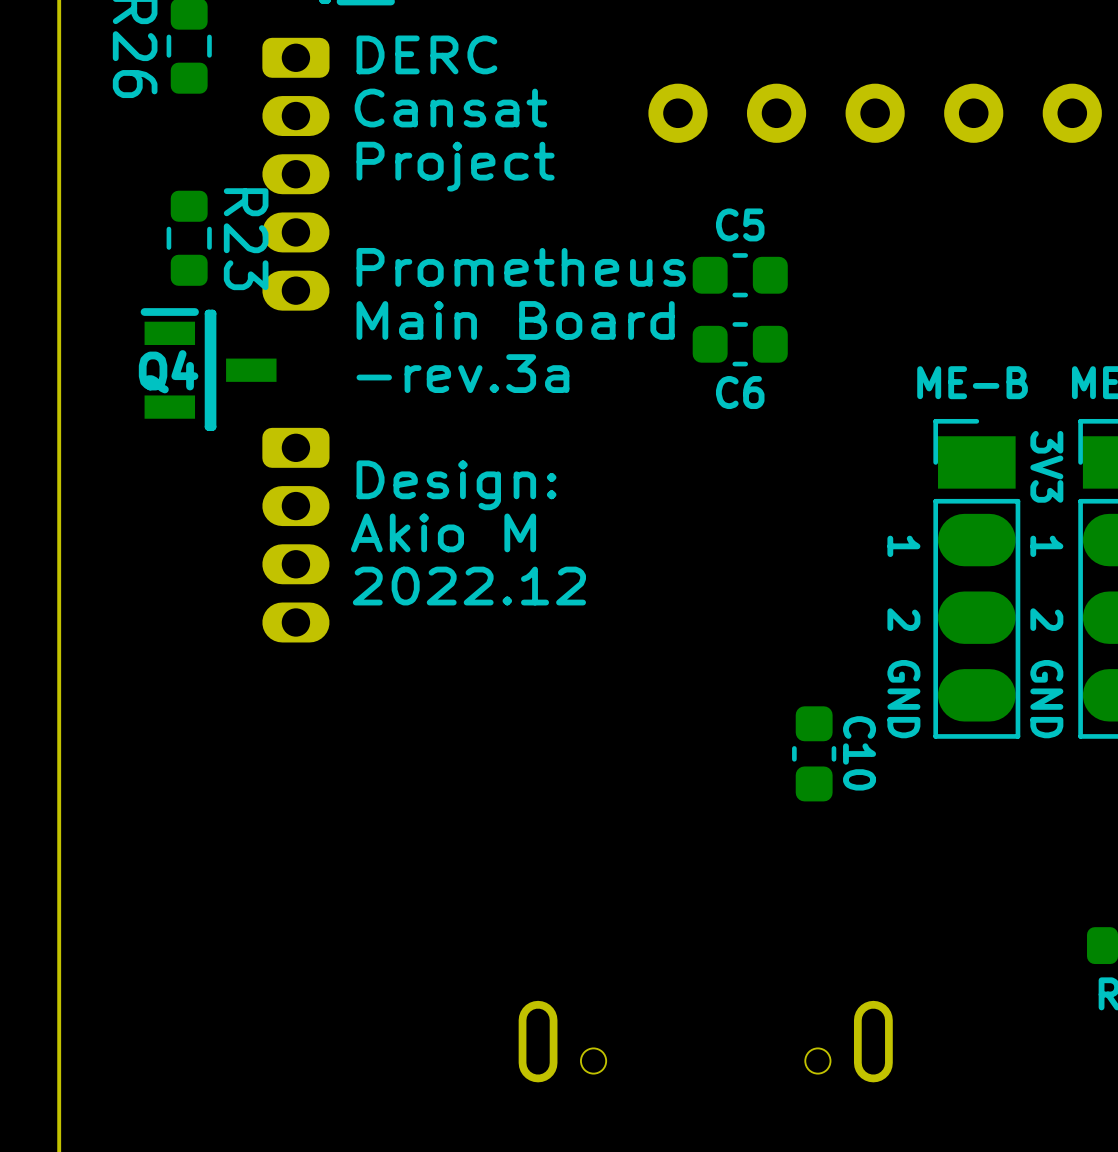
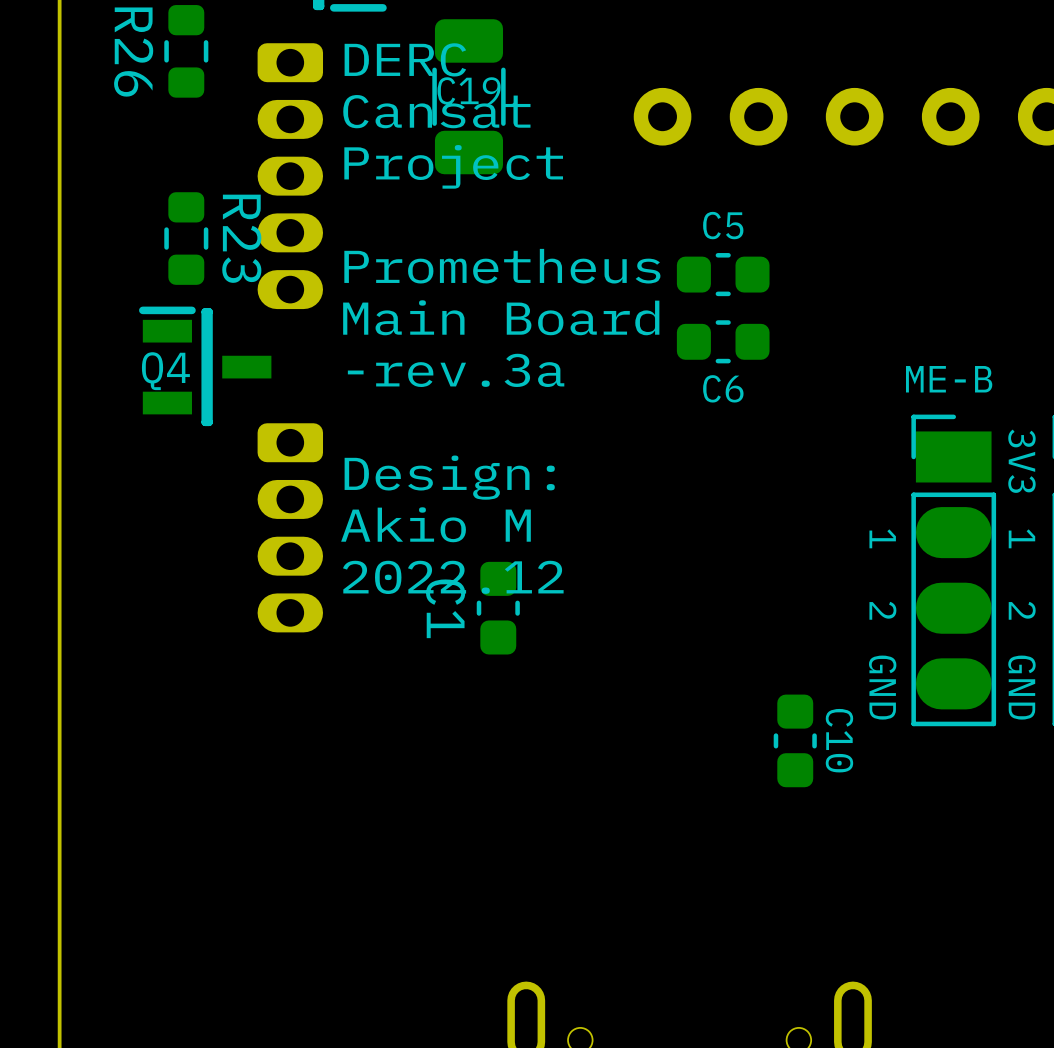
C19: none -> (468, 96)
C1: none -> (498, 608)

